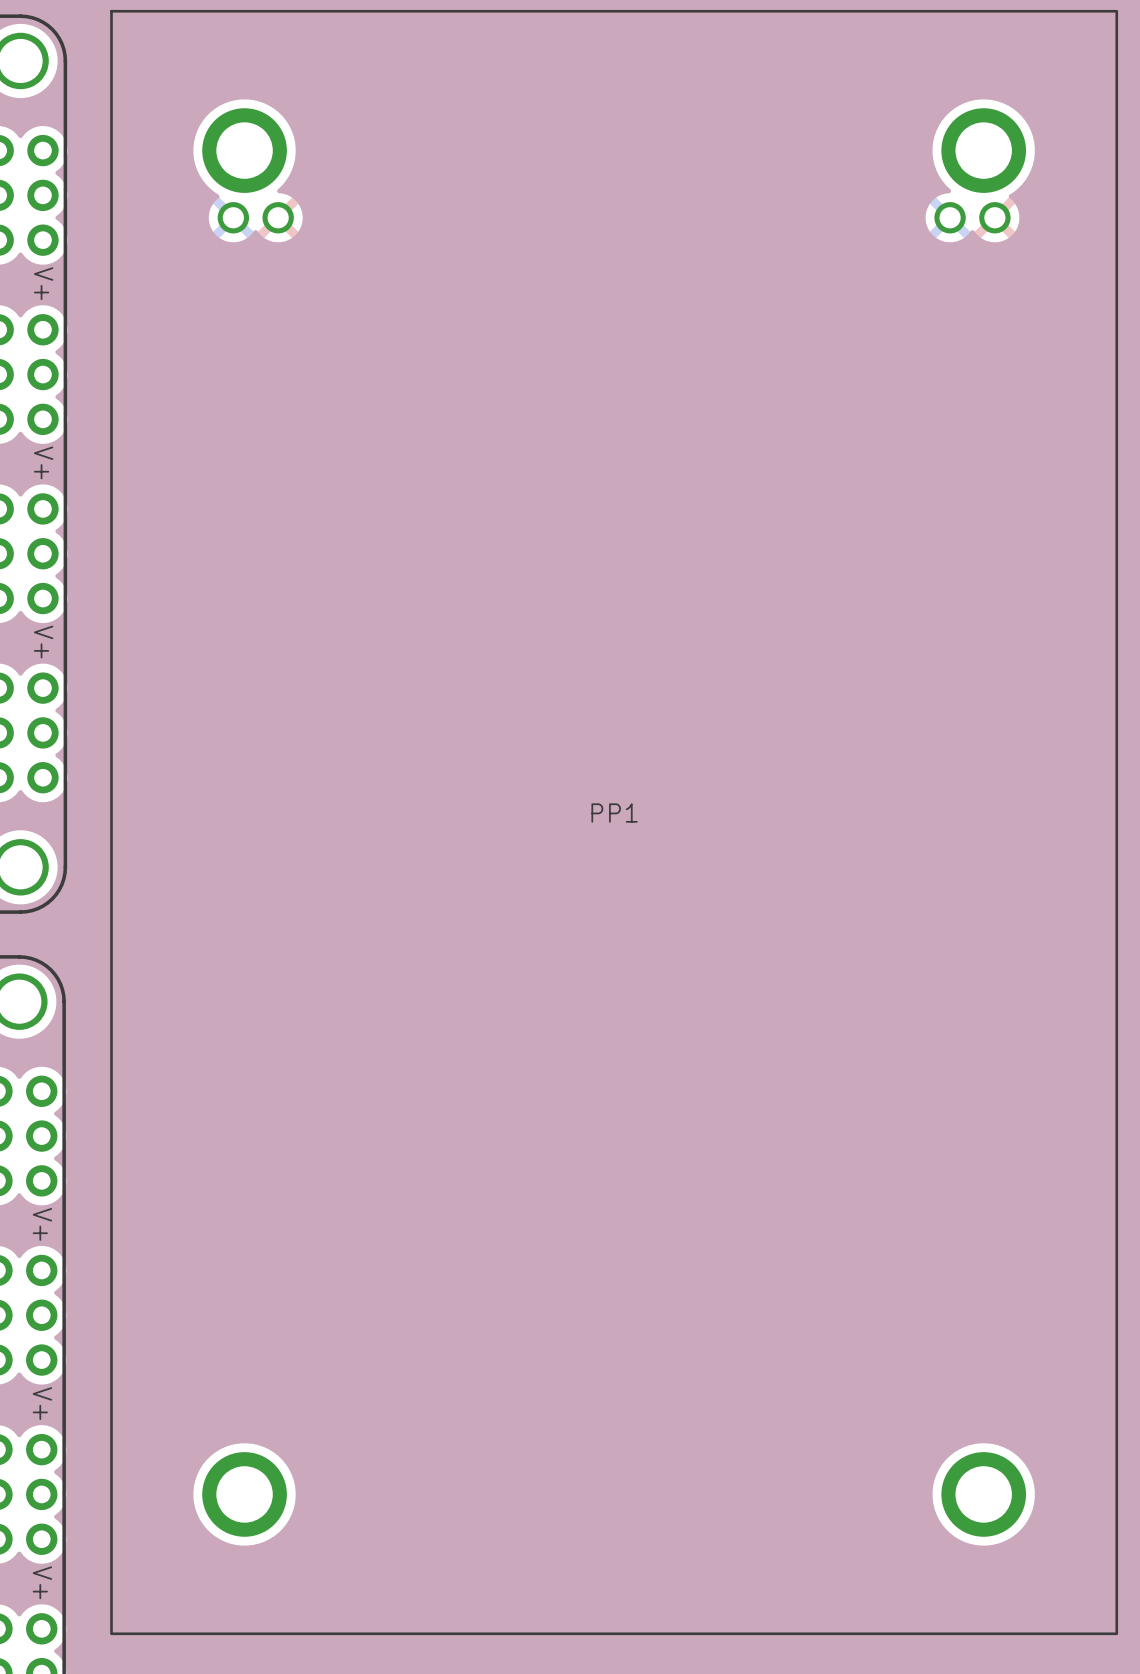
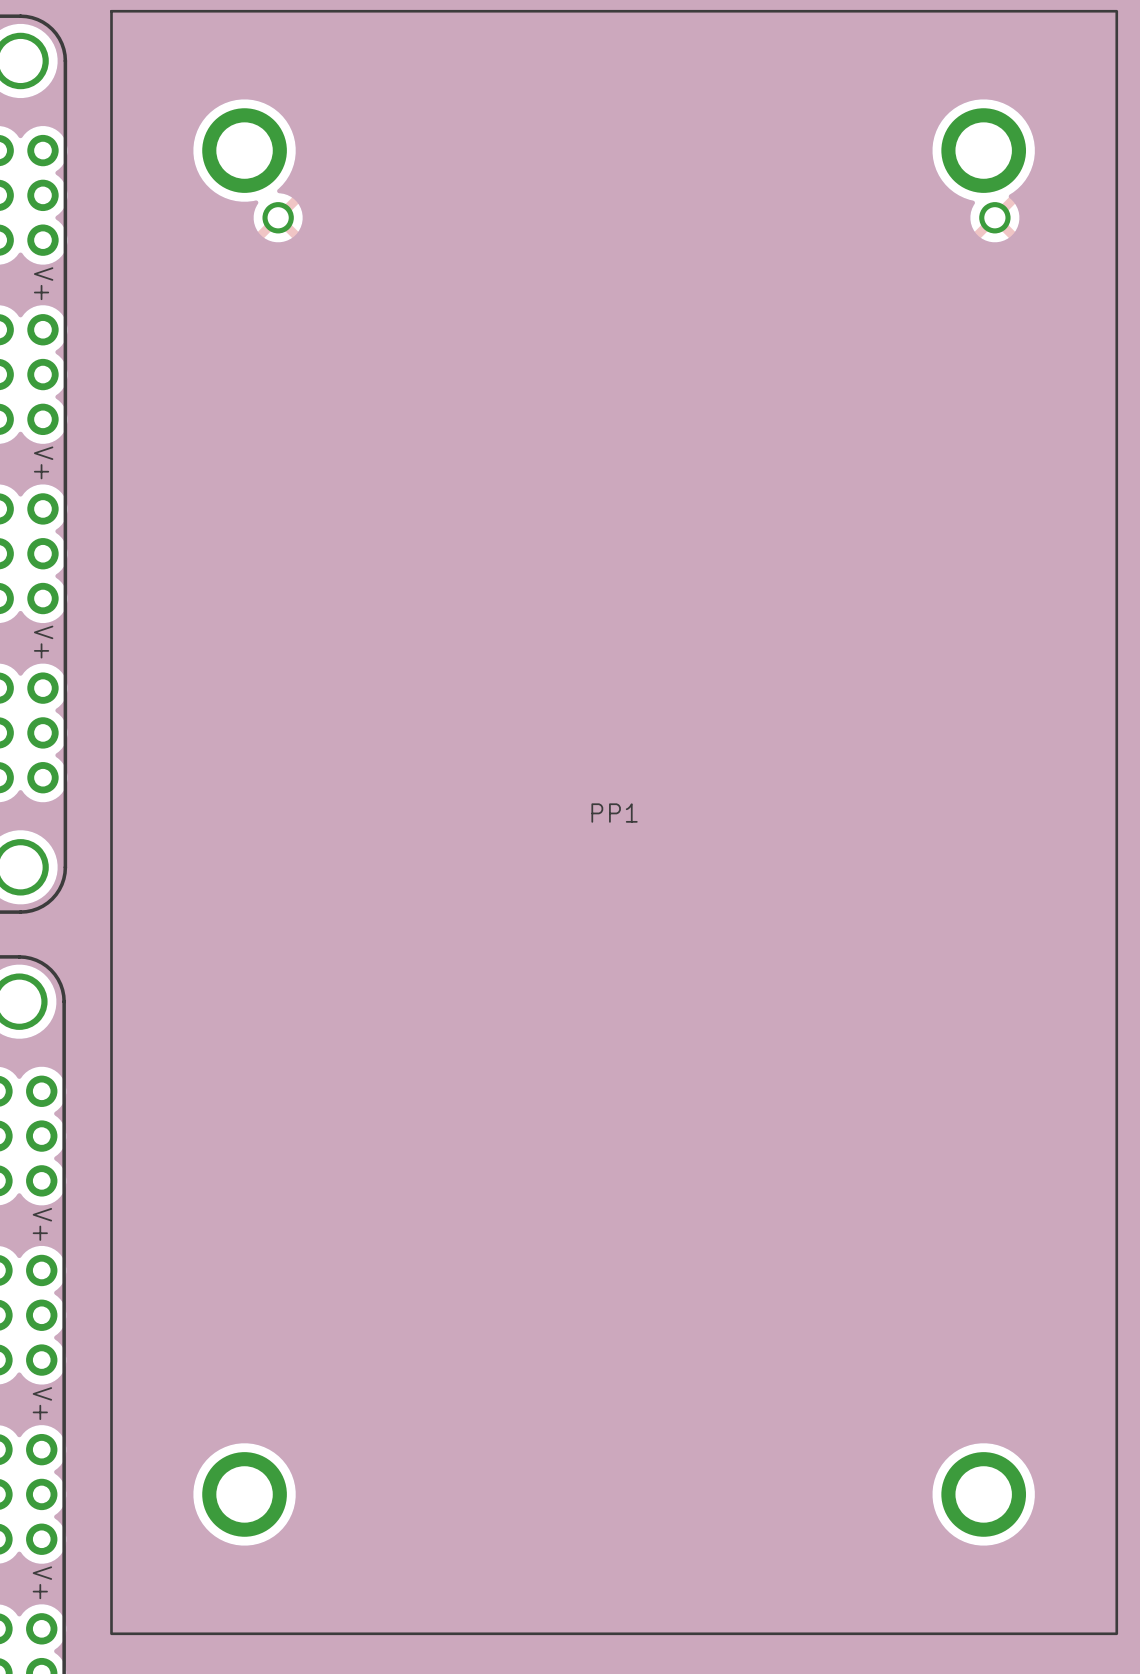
PP1 footprint: [110, 9, 1119, 1636] -> [110, 9, 1119, 1636]

